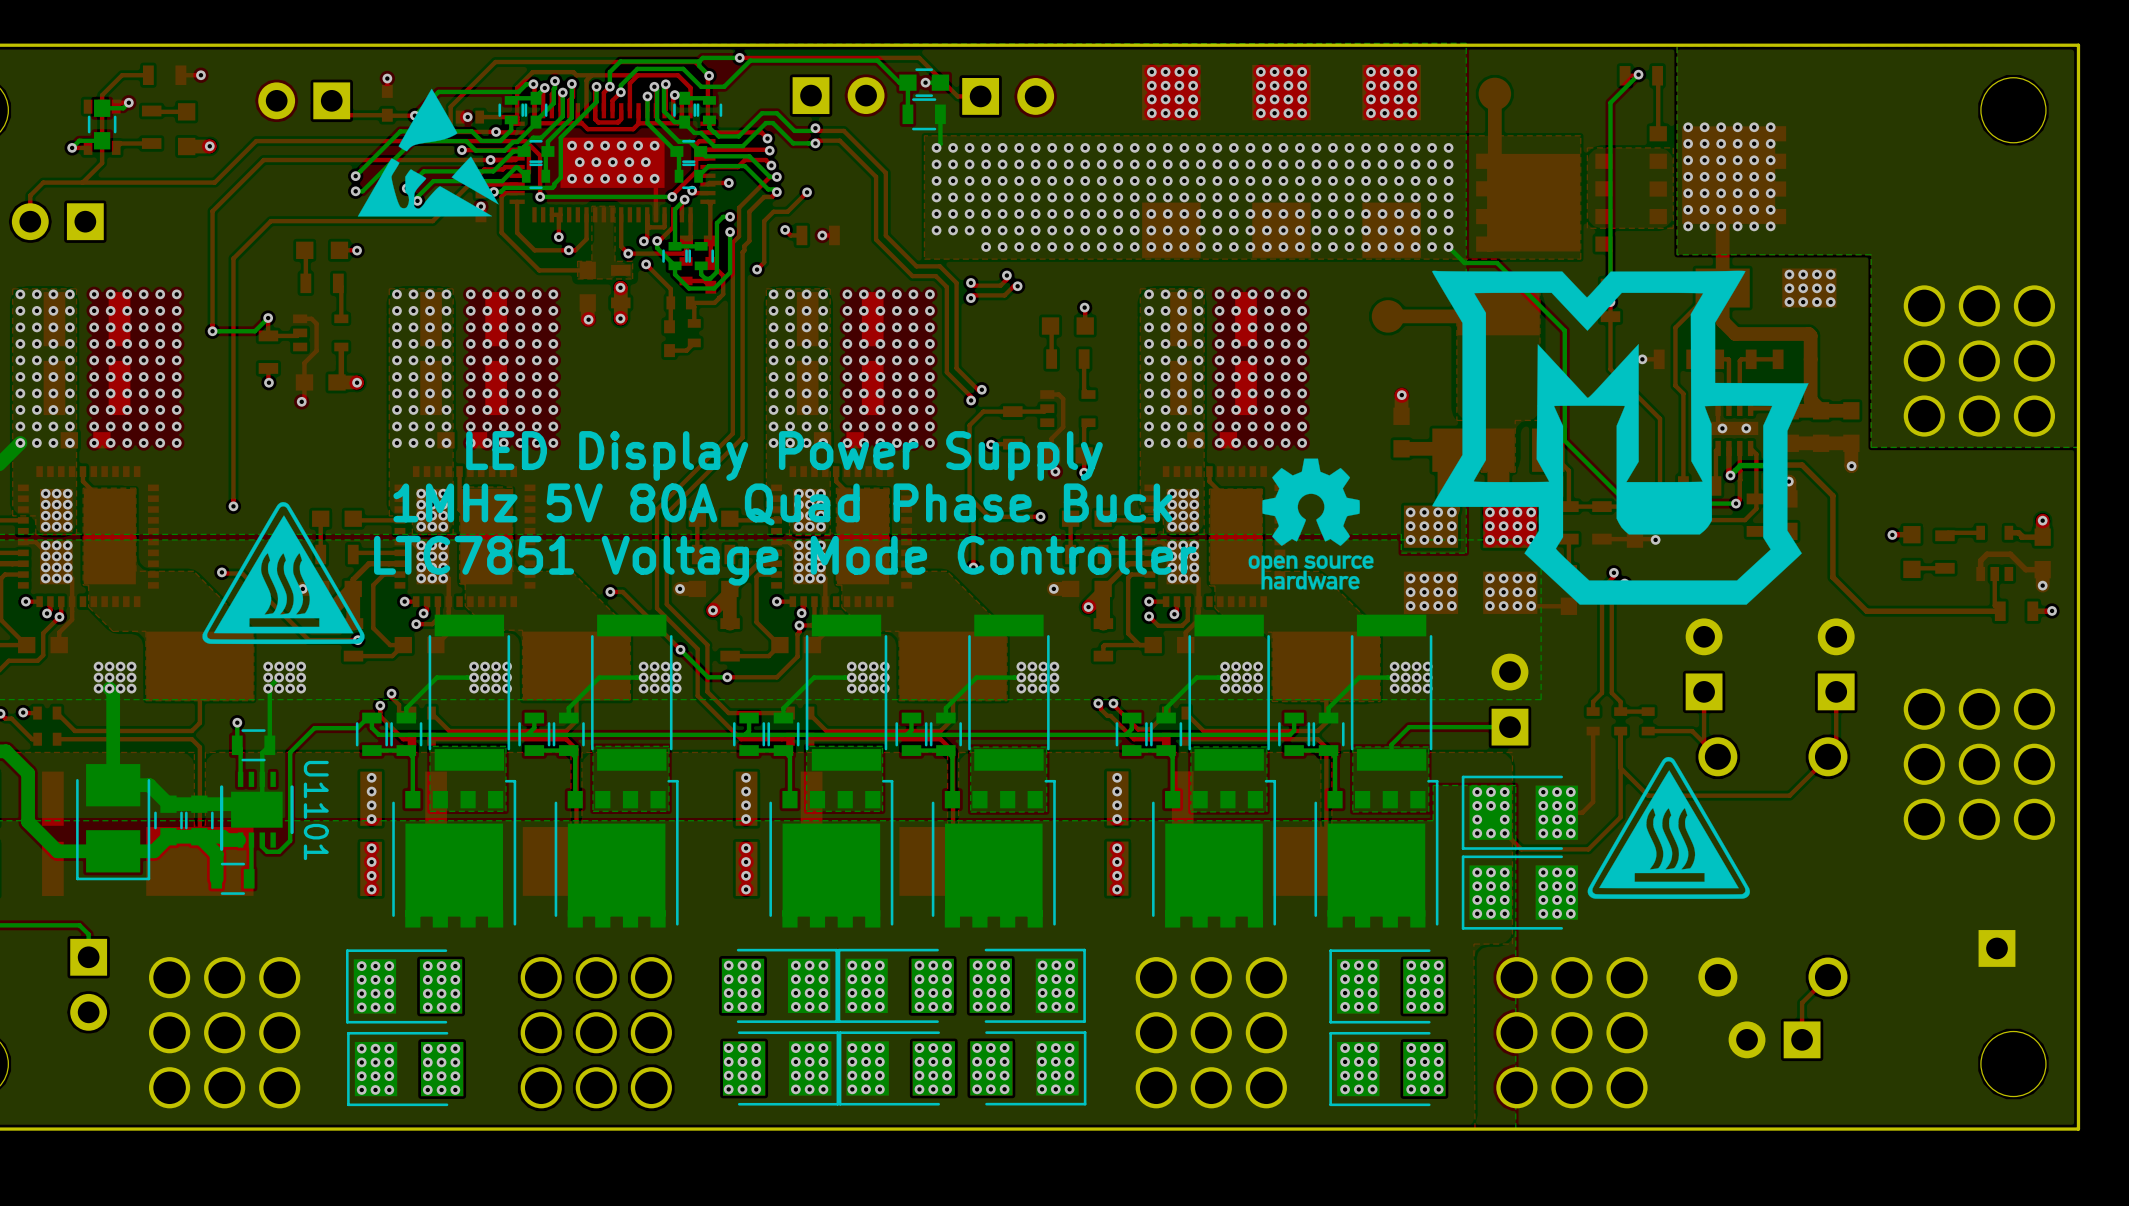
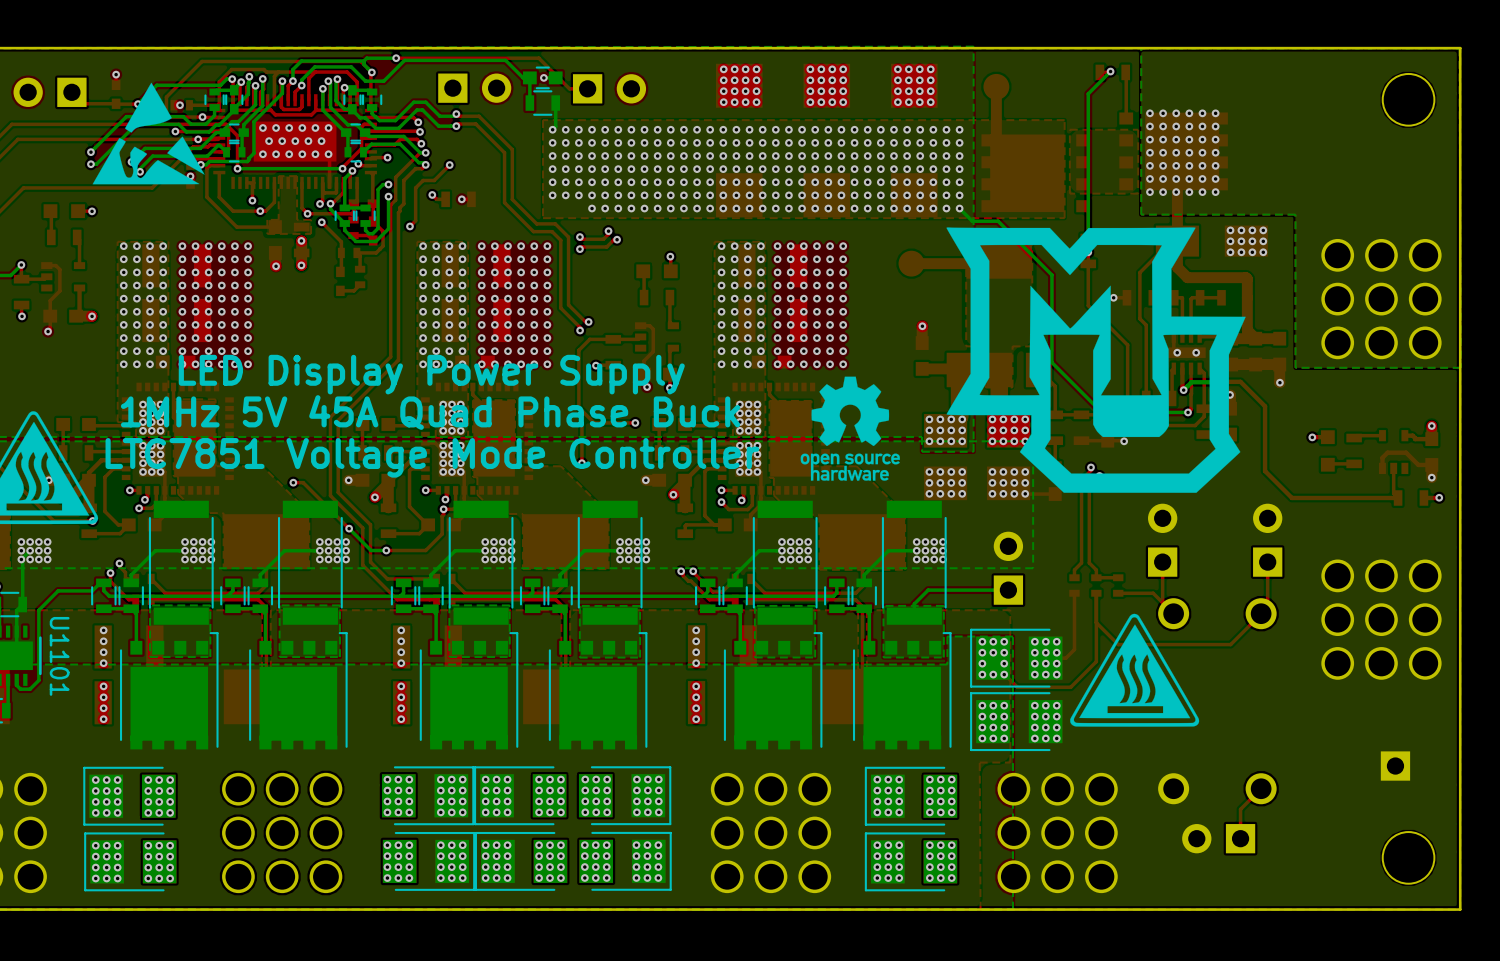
text: 1MHz 5V 80A Quad Phase Buck (782, 504) -> 1MHz 5V 45A Quad Phase Buck (430, 412)

